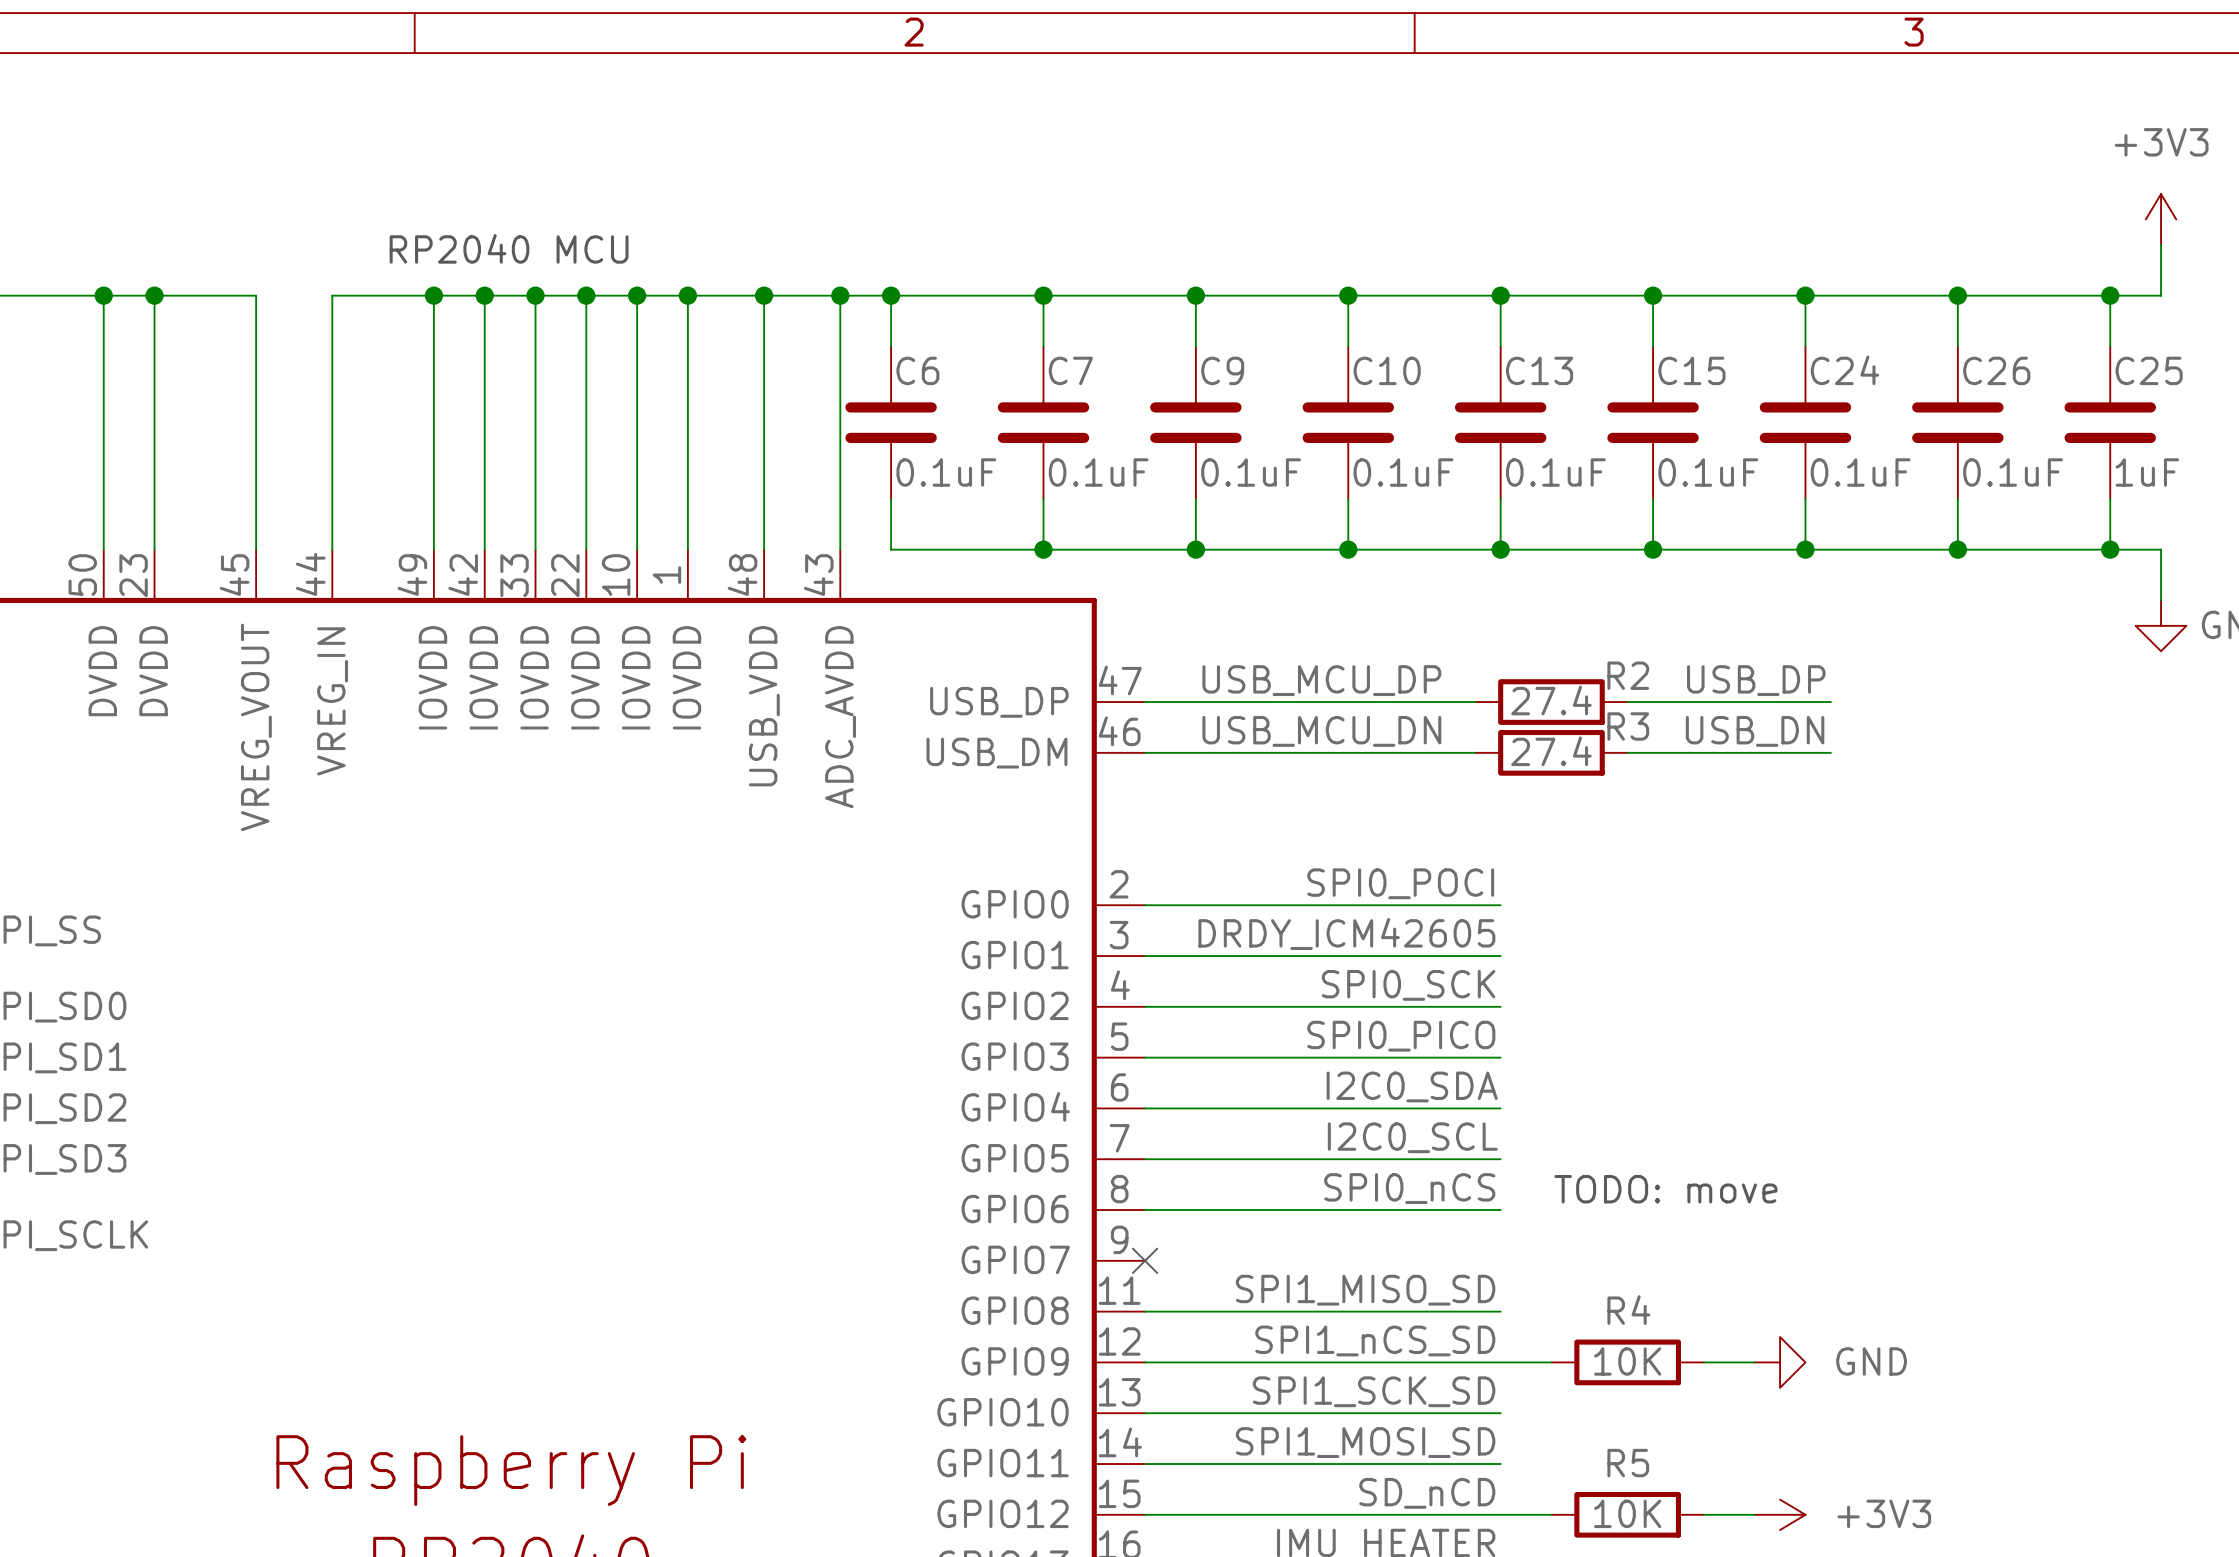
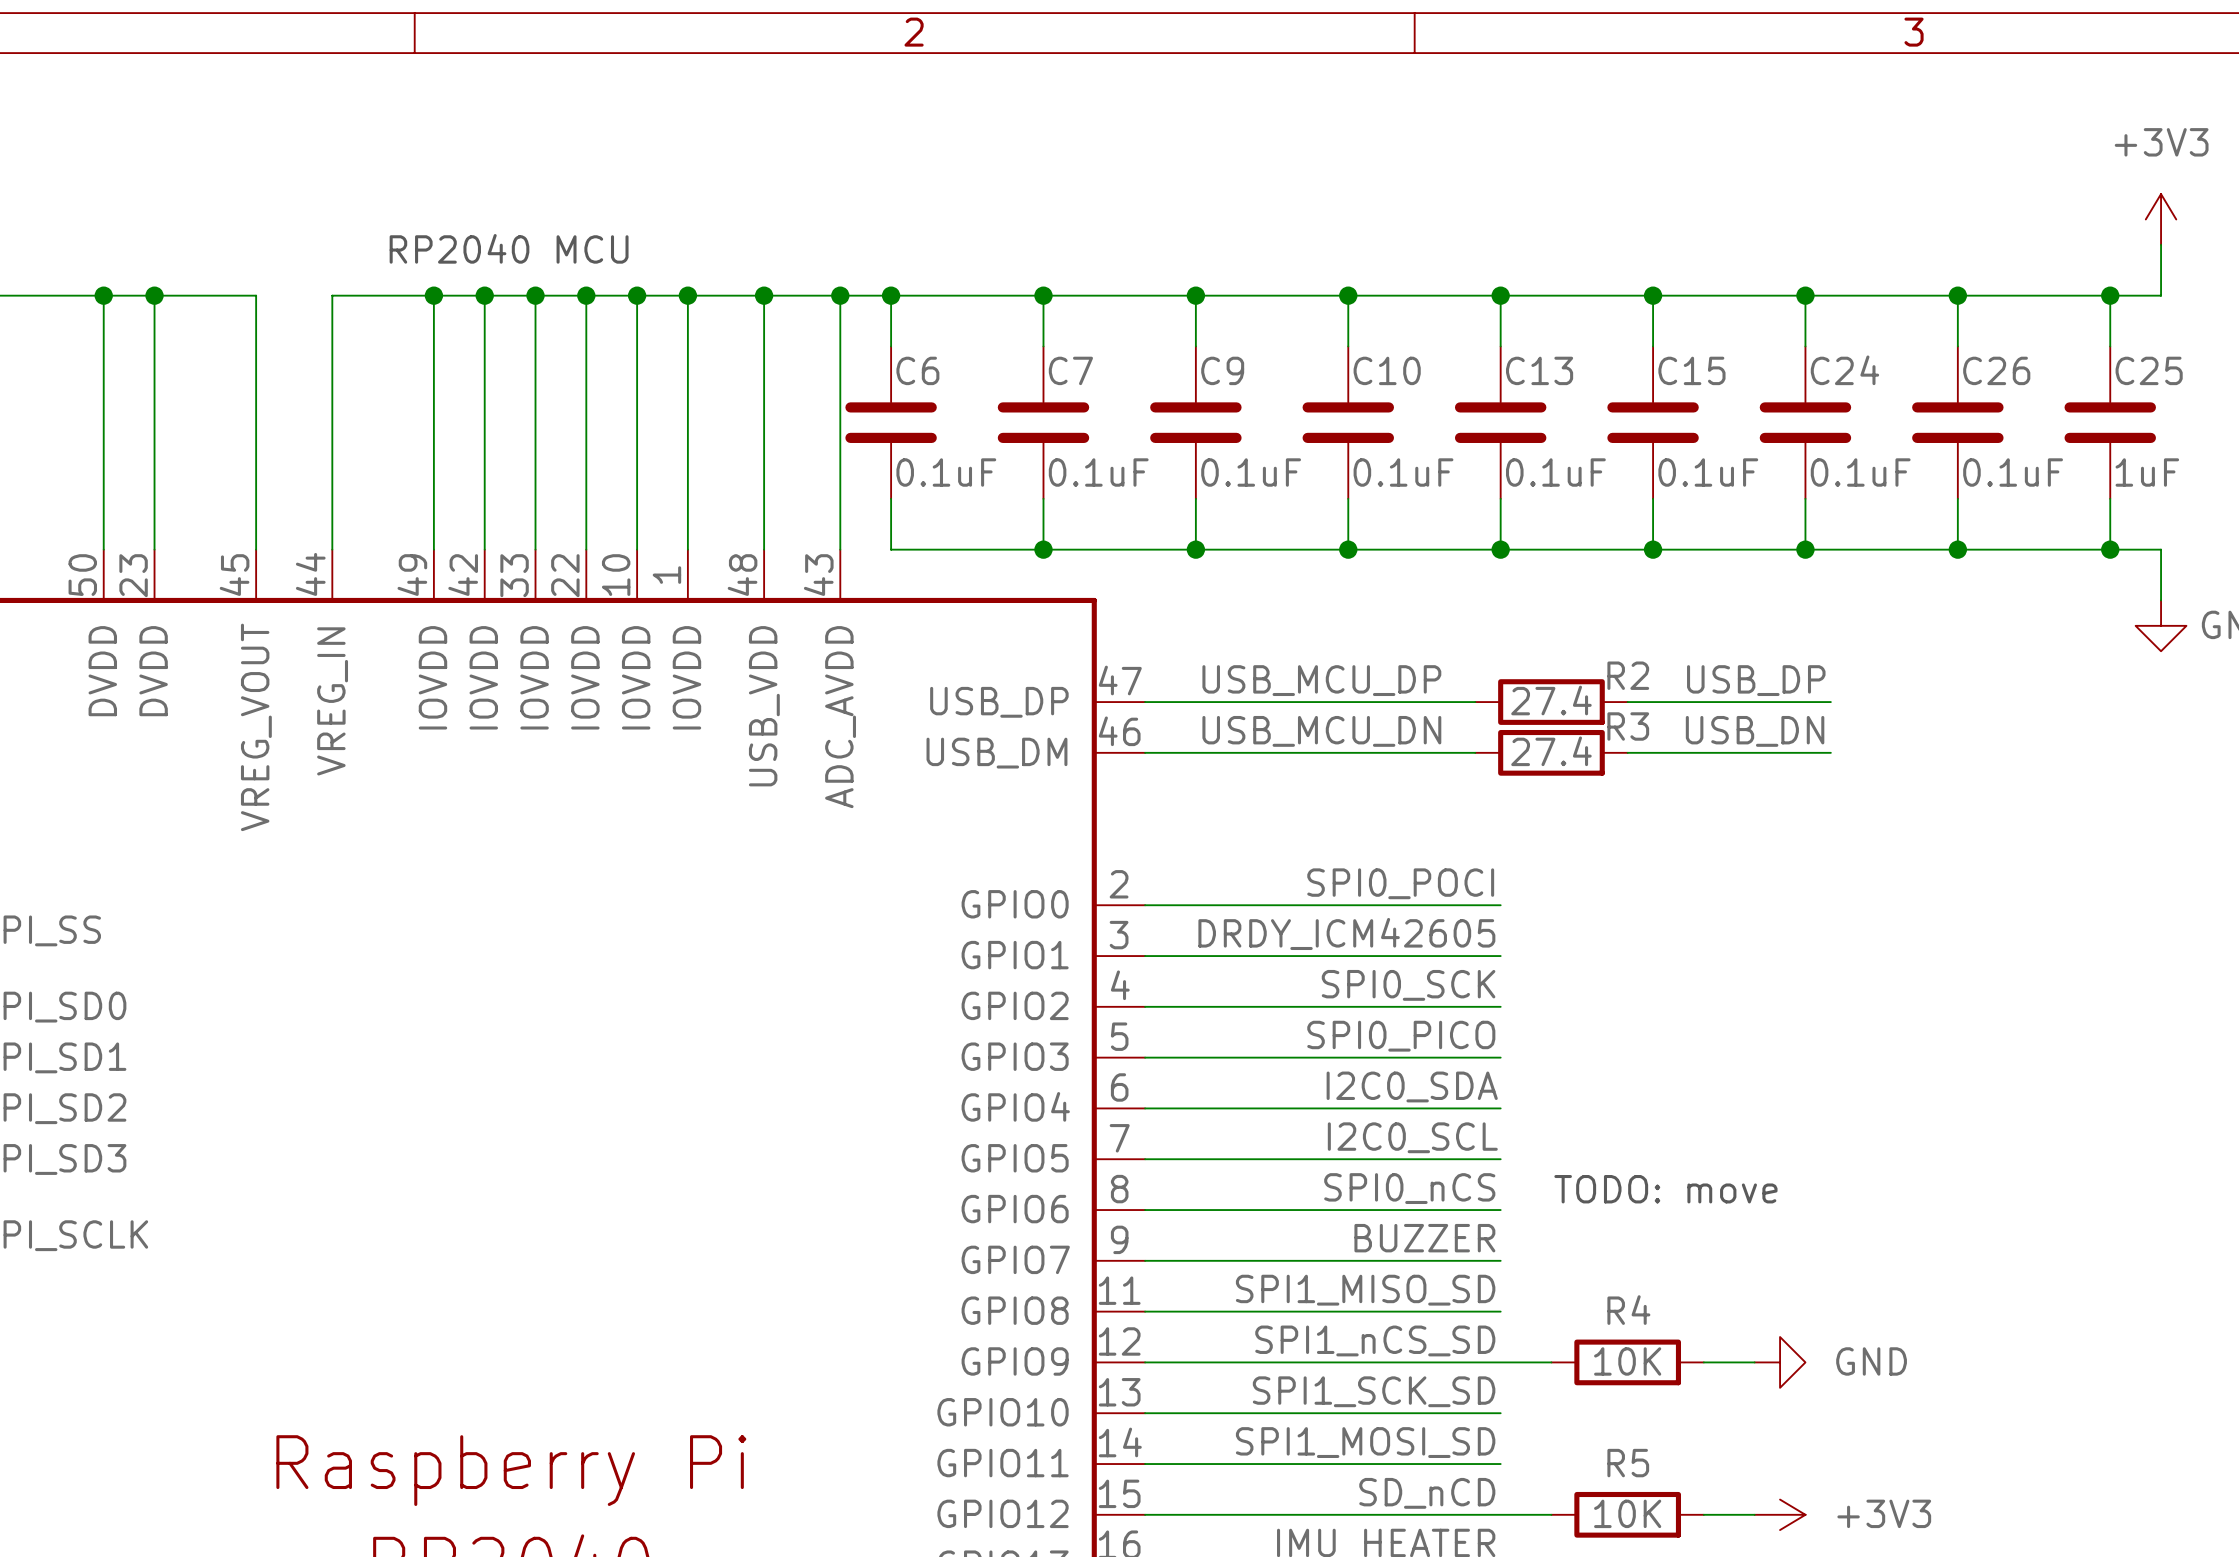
label: none -> BUZZER (1424, 1238)
wire: none -> (1145, 1260) (1500, 1260)
no-connect mark: (1145, 1260) -> none

